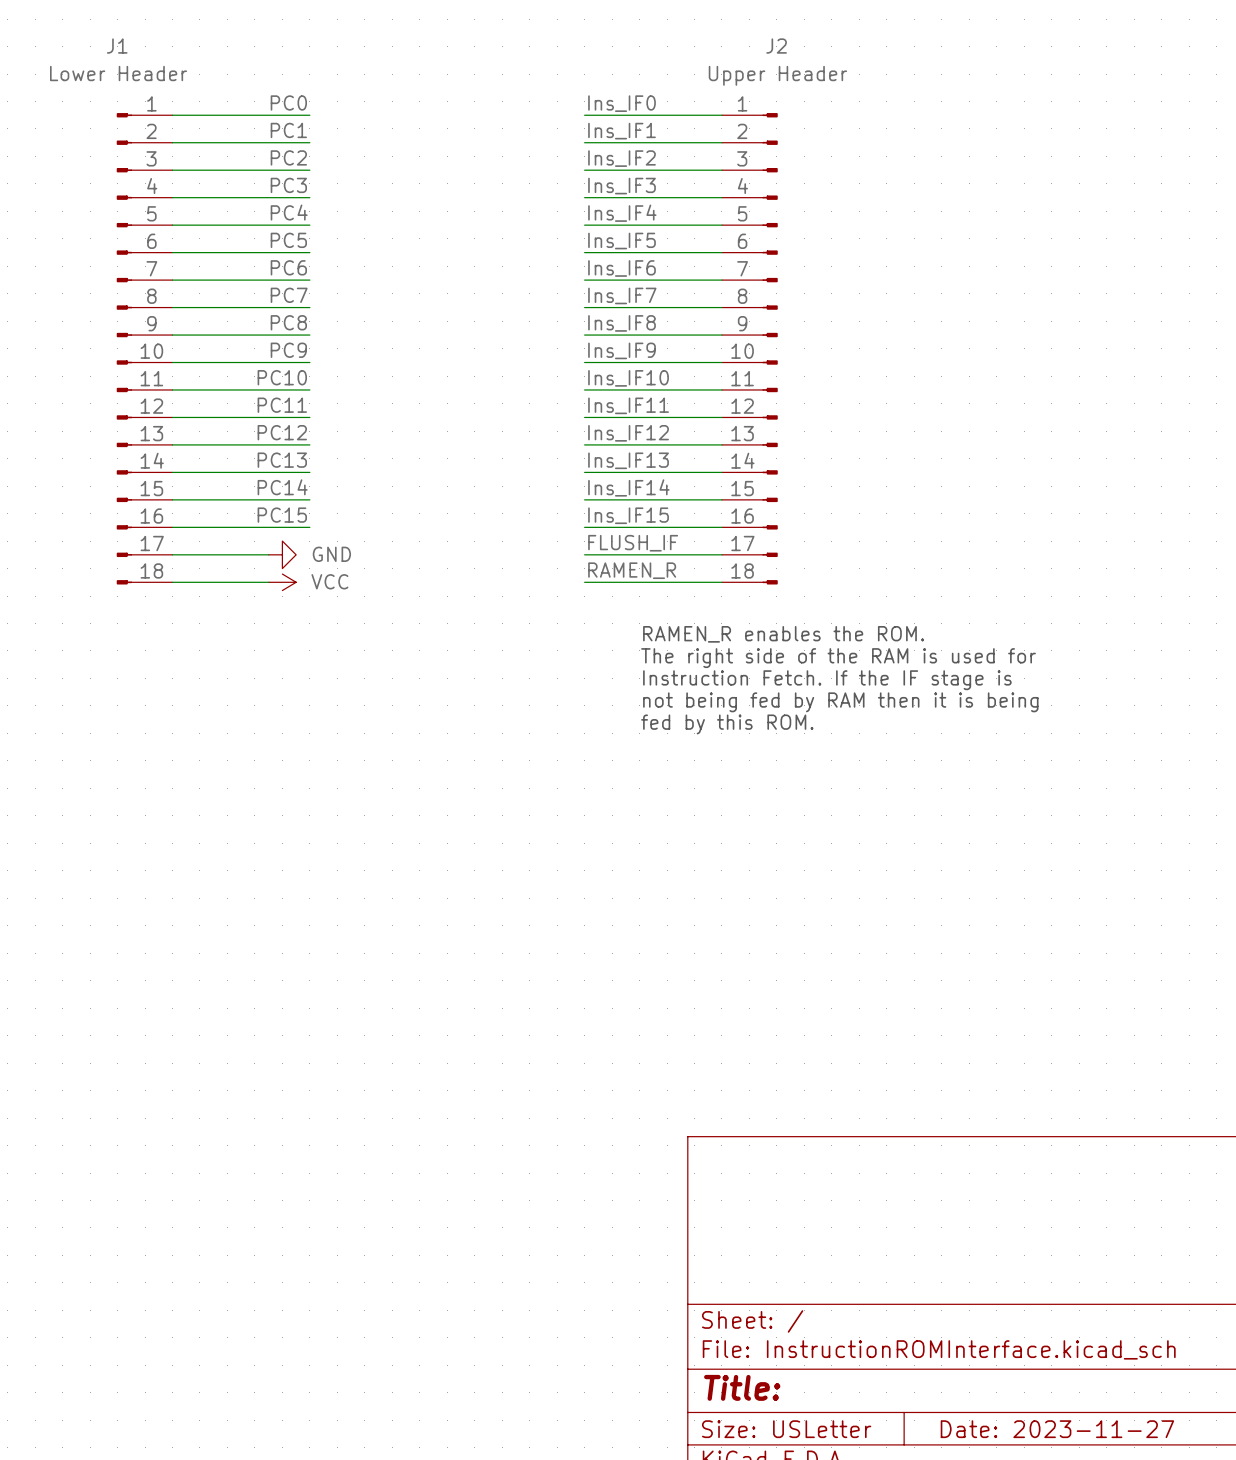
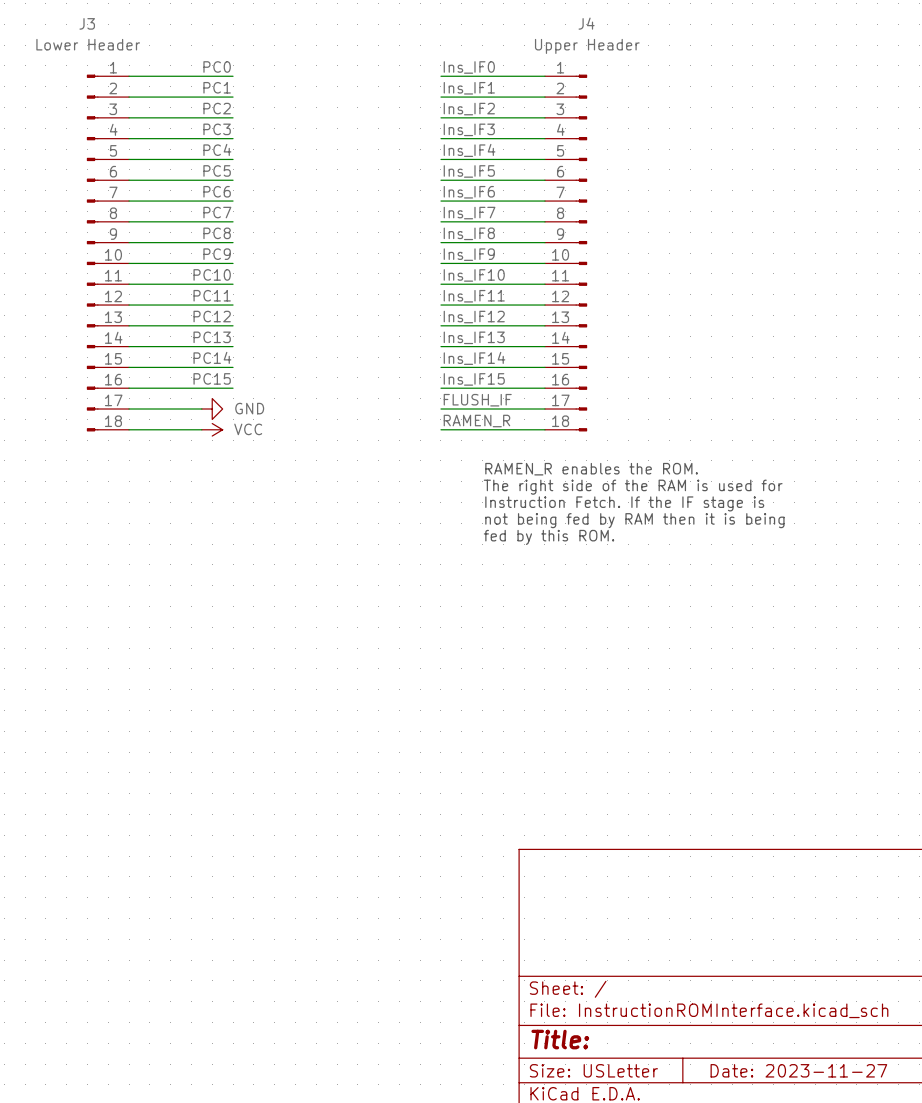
J1 name: J1 (117, 46) -> J3 (87, 23)
J2 name: J2 (776, 46) -> J4 (586, 23)

